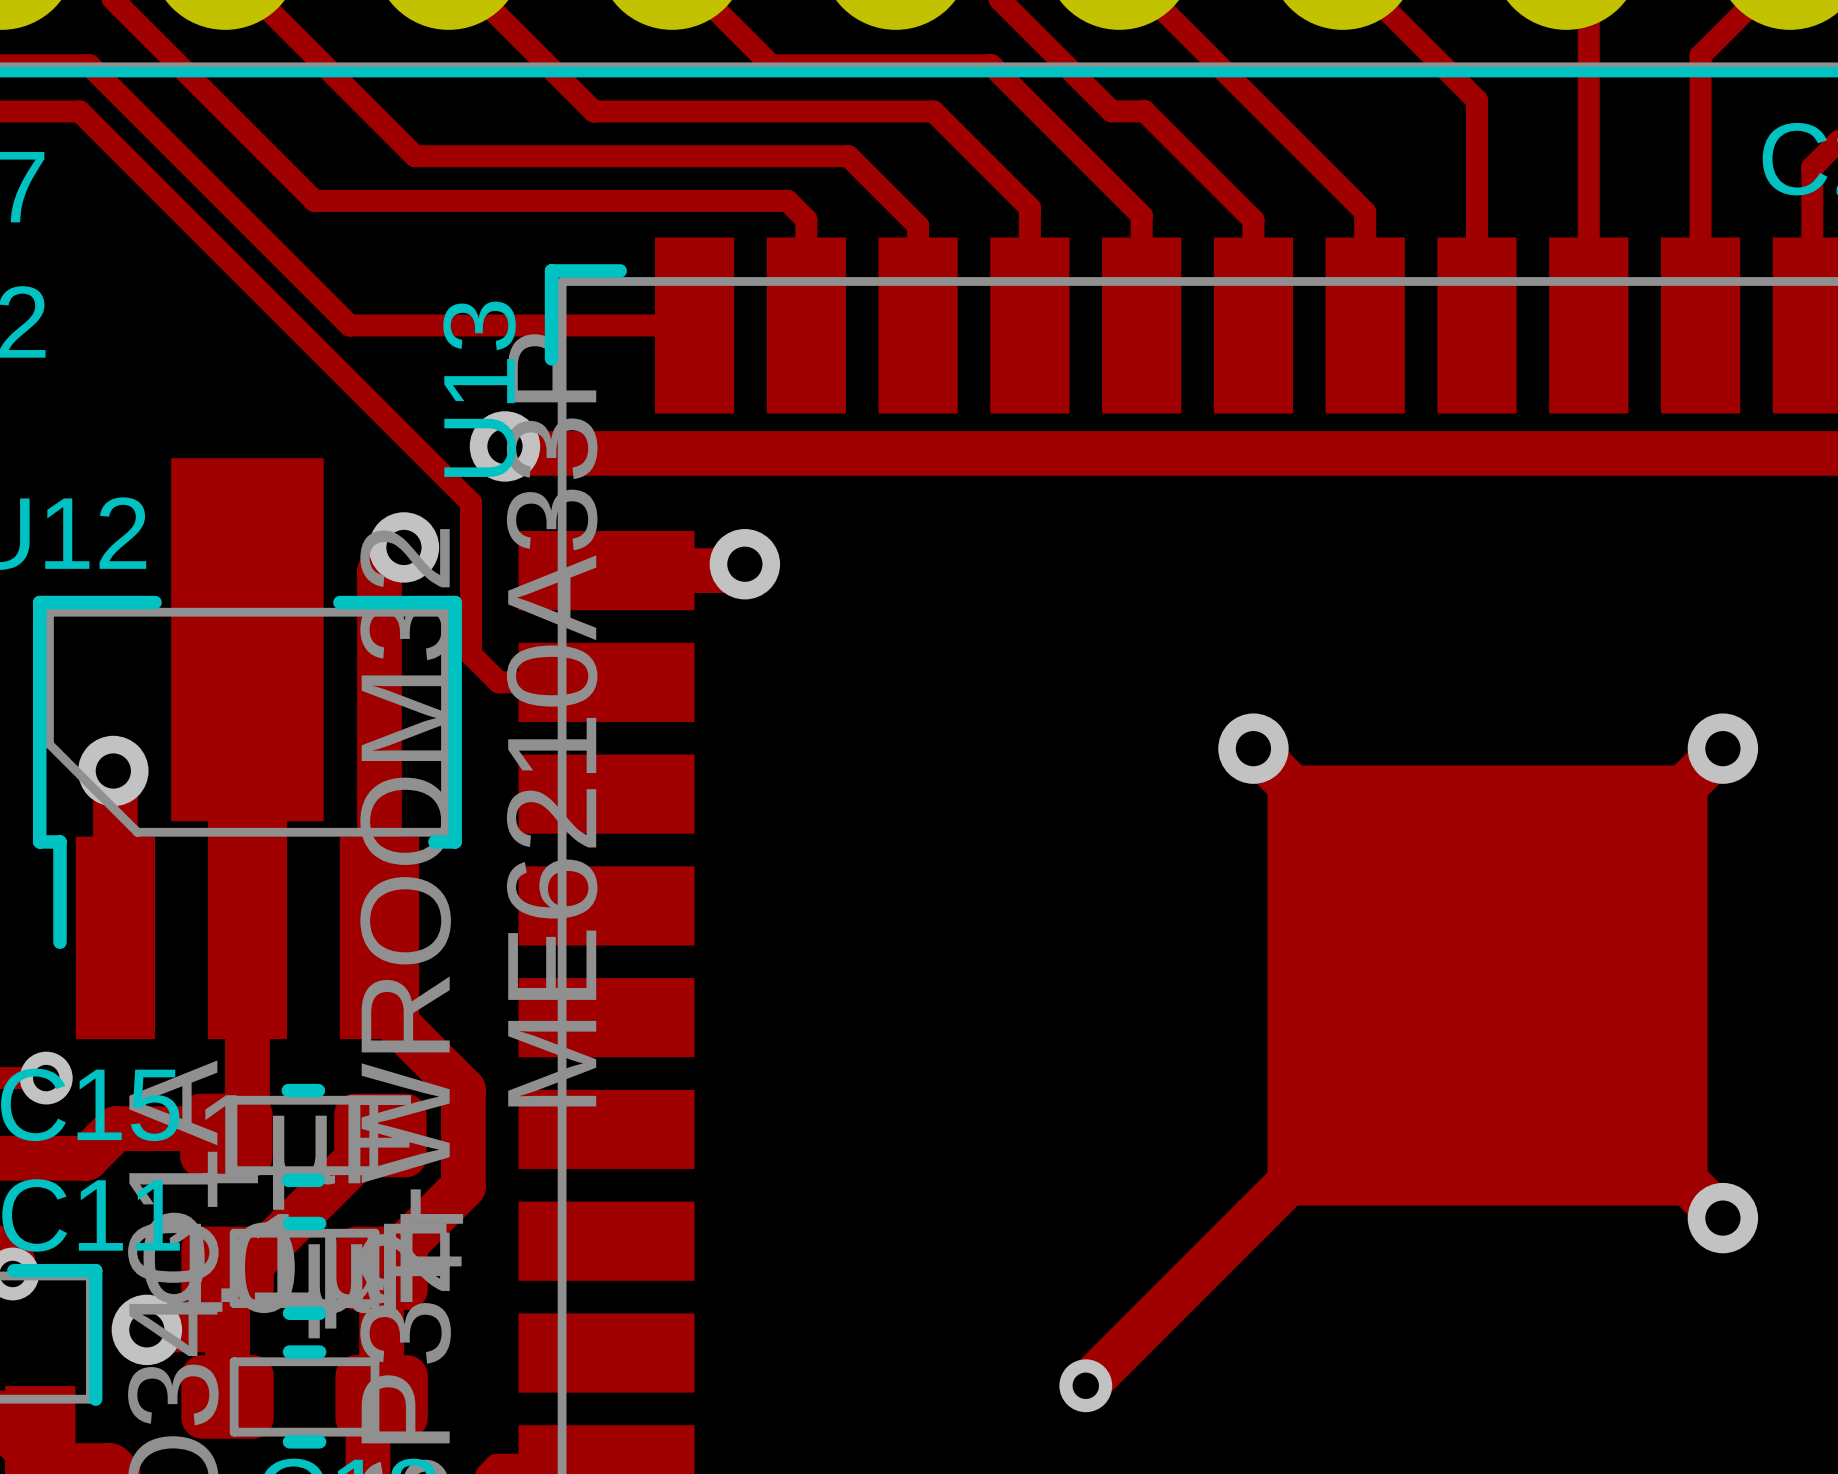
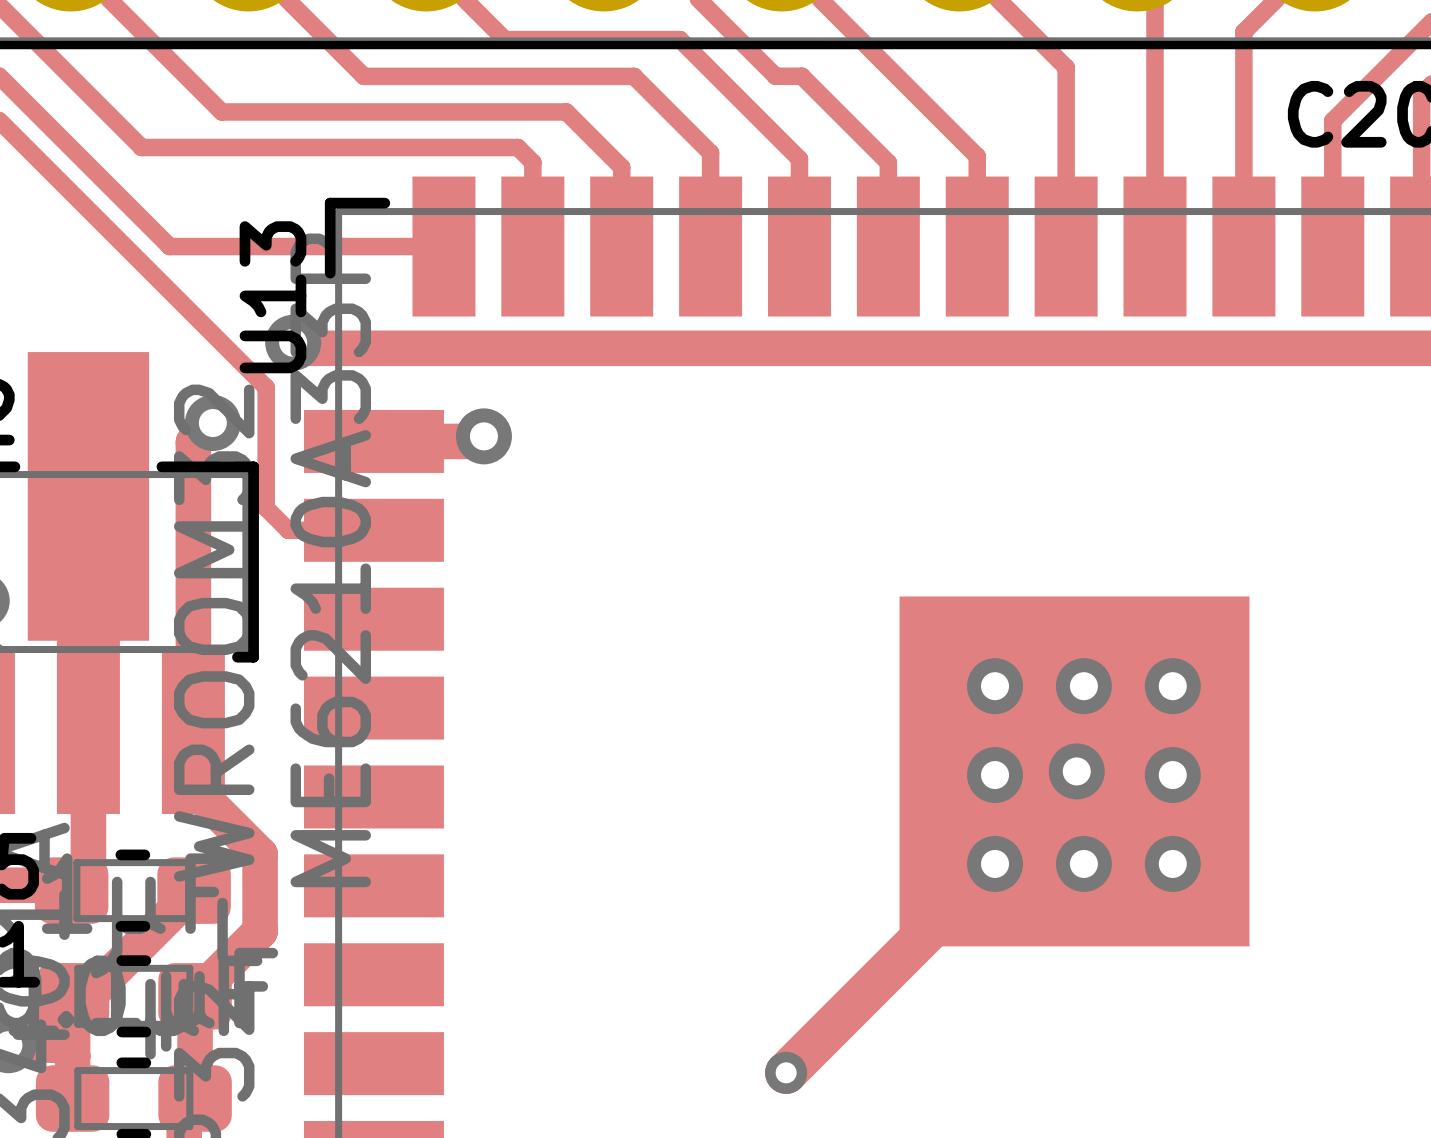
via: (1253, 748) -> none
via: (1722, 748) -> none
via: none -> (995, 686)
via: none -> (1083, 686)
via: none -> (1172, 686)
track: (1485, 985) (1085, 1385) -> none
via: none -> (1076, 771)
via: none -> (995, 775)
via: none -> (1172, 775)
track: none -> (995, 863) (786, 1072)
via: none -> (995, 863)
via: none -> (1083, 863)
via: none -> (1172, 863)
via: (1722, 1218) -> none
via position: (1085, 1385) -> (786, 1072)

